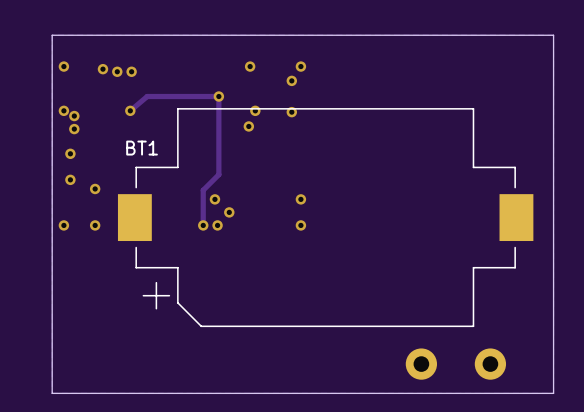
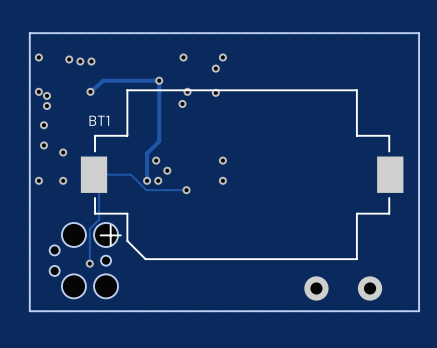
track: none -> (186, 190) (146, 190) (130, 174) (99, 174) (99, 219) (89, 228) (89, 263)
via: none -> (186, 190)
part: none -> (83, 260)
via: none -> (89, 263)

